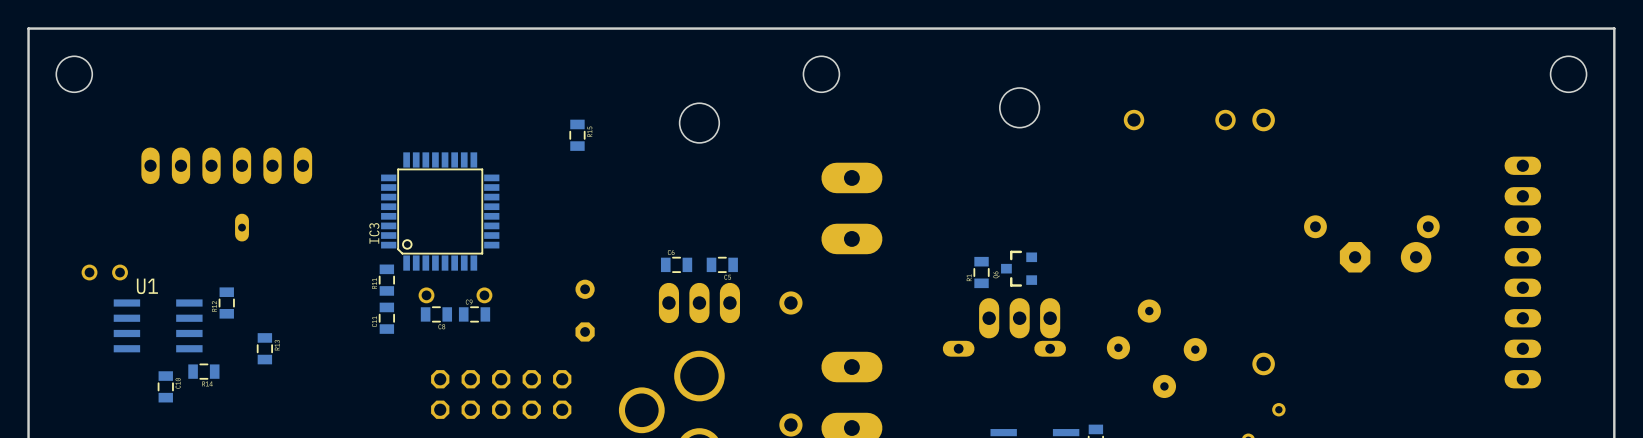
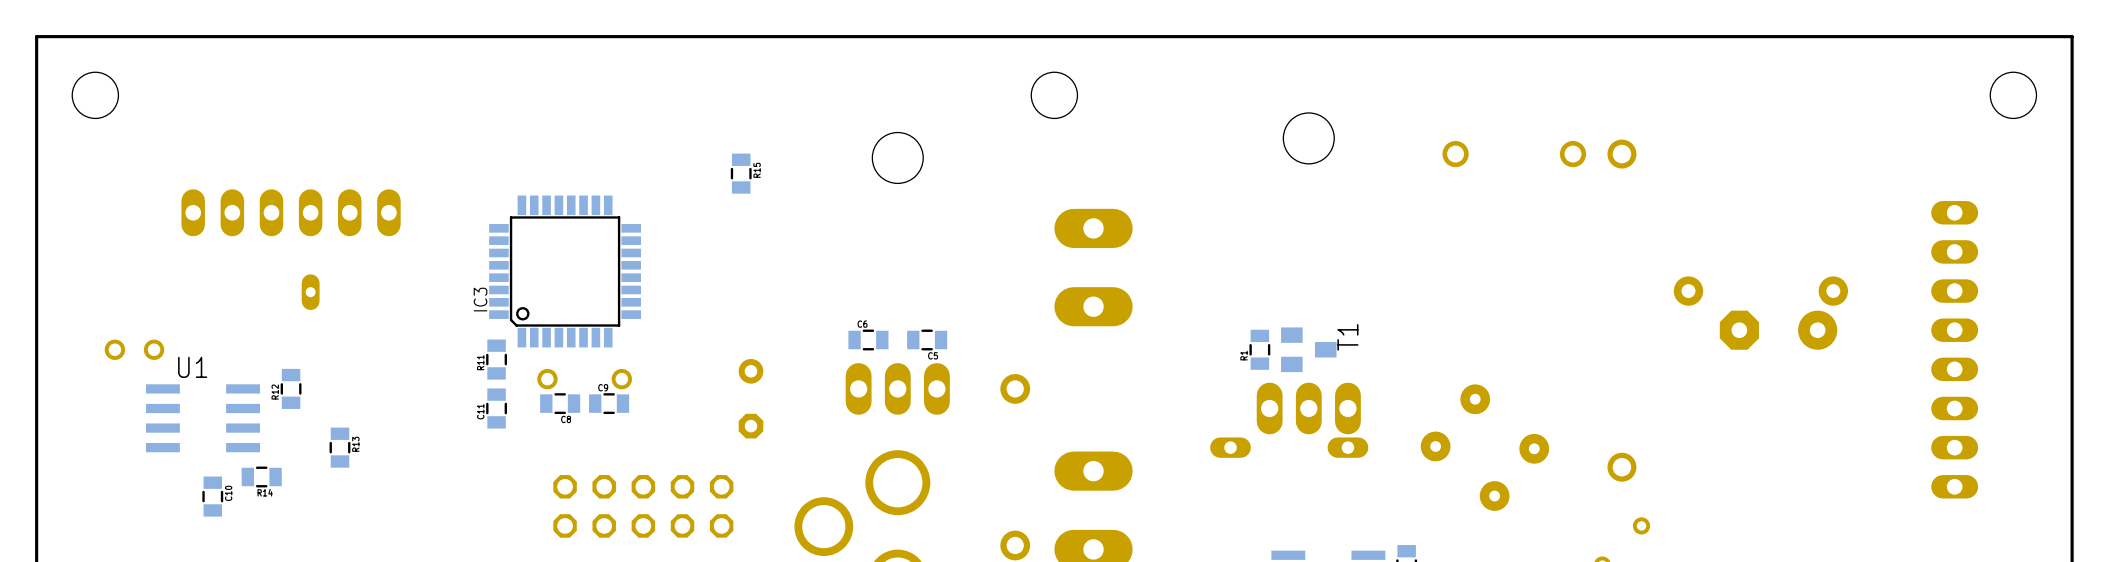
part: (1019, 268) -> none
T1: none -> (1308, 349)

